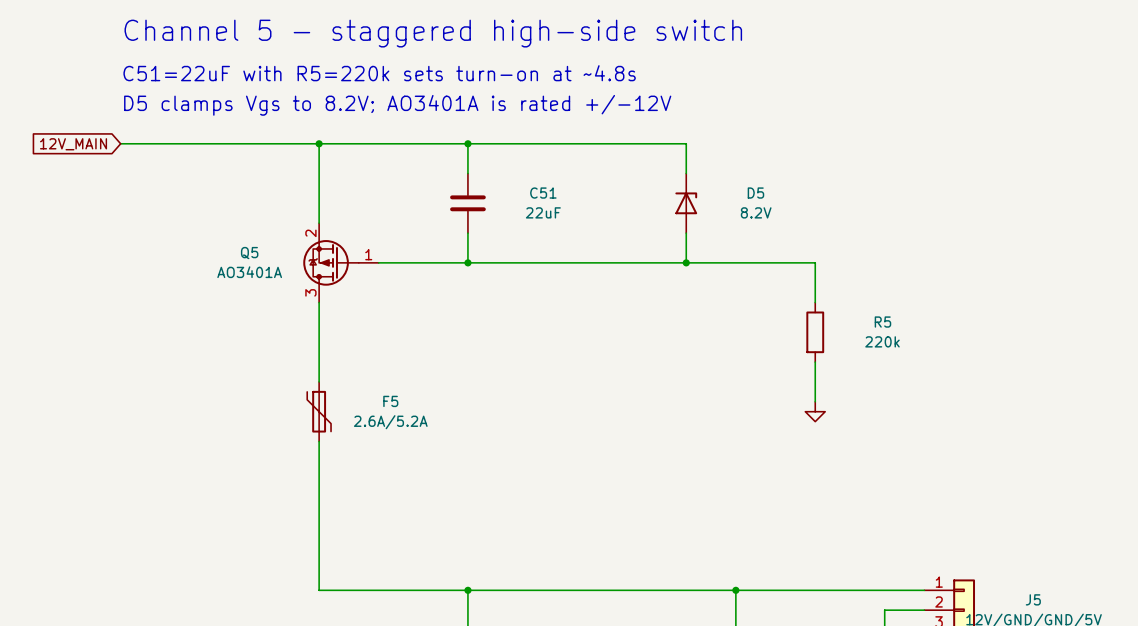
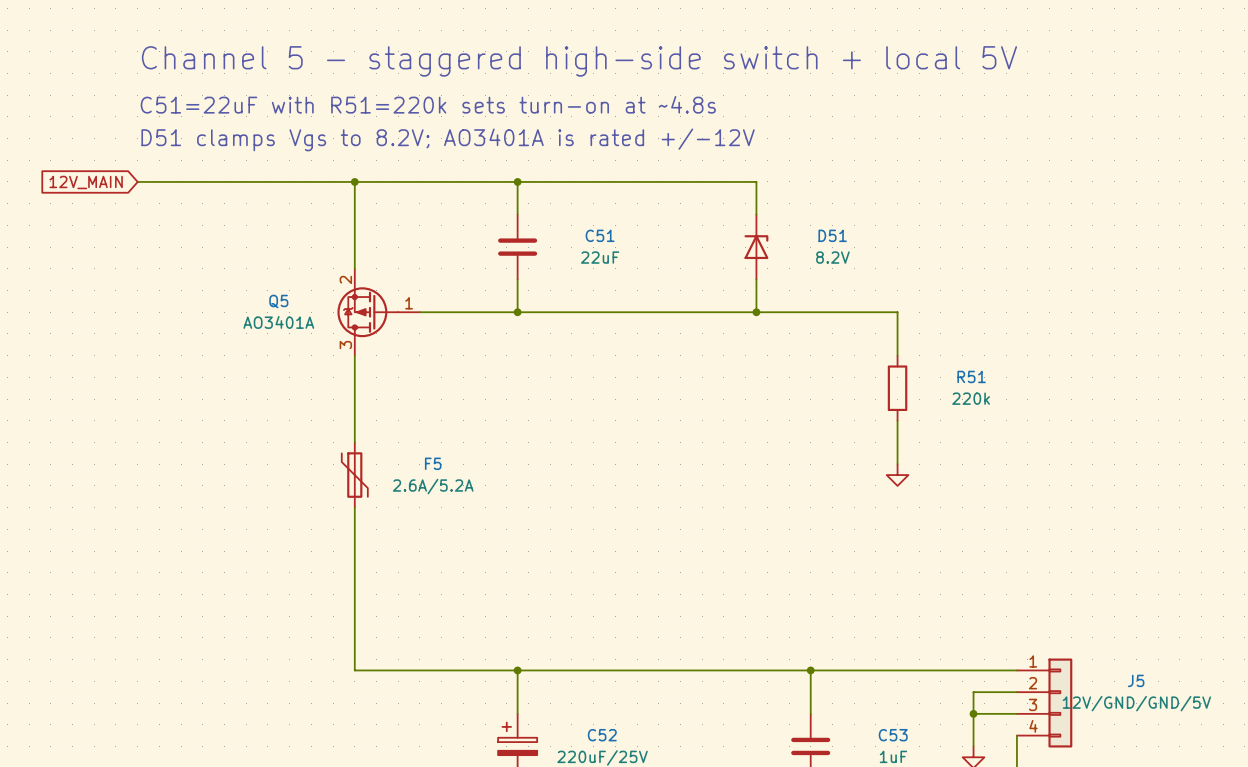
text: Channel 5 - staggered high-side switch (433, 33) -> Channel 5 - staggered high-side switch + local 5V (579, 61)
text: C51=22uF with R5=220k sets turn-on at ~4.8s (379, 73) -> C51=22uF with R51=220k sets turn-on at ~4.8s (428, 104)
text: D5 clamps Vgs to 8.2V; AO3401A is rated +/-12V (397, 105) -> D51 clamps Vgs to 8.2V; AO3401A is rated +/-12V (448, 139)
D5 name: D5 (755, 193) -> D51 (832, 235)
R5 name: R5 (882, 322) -> R51 (971, 376)

